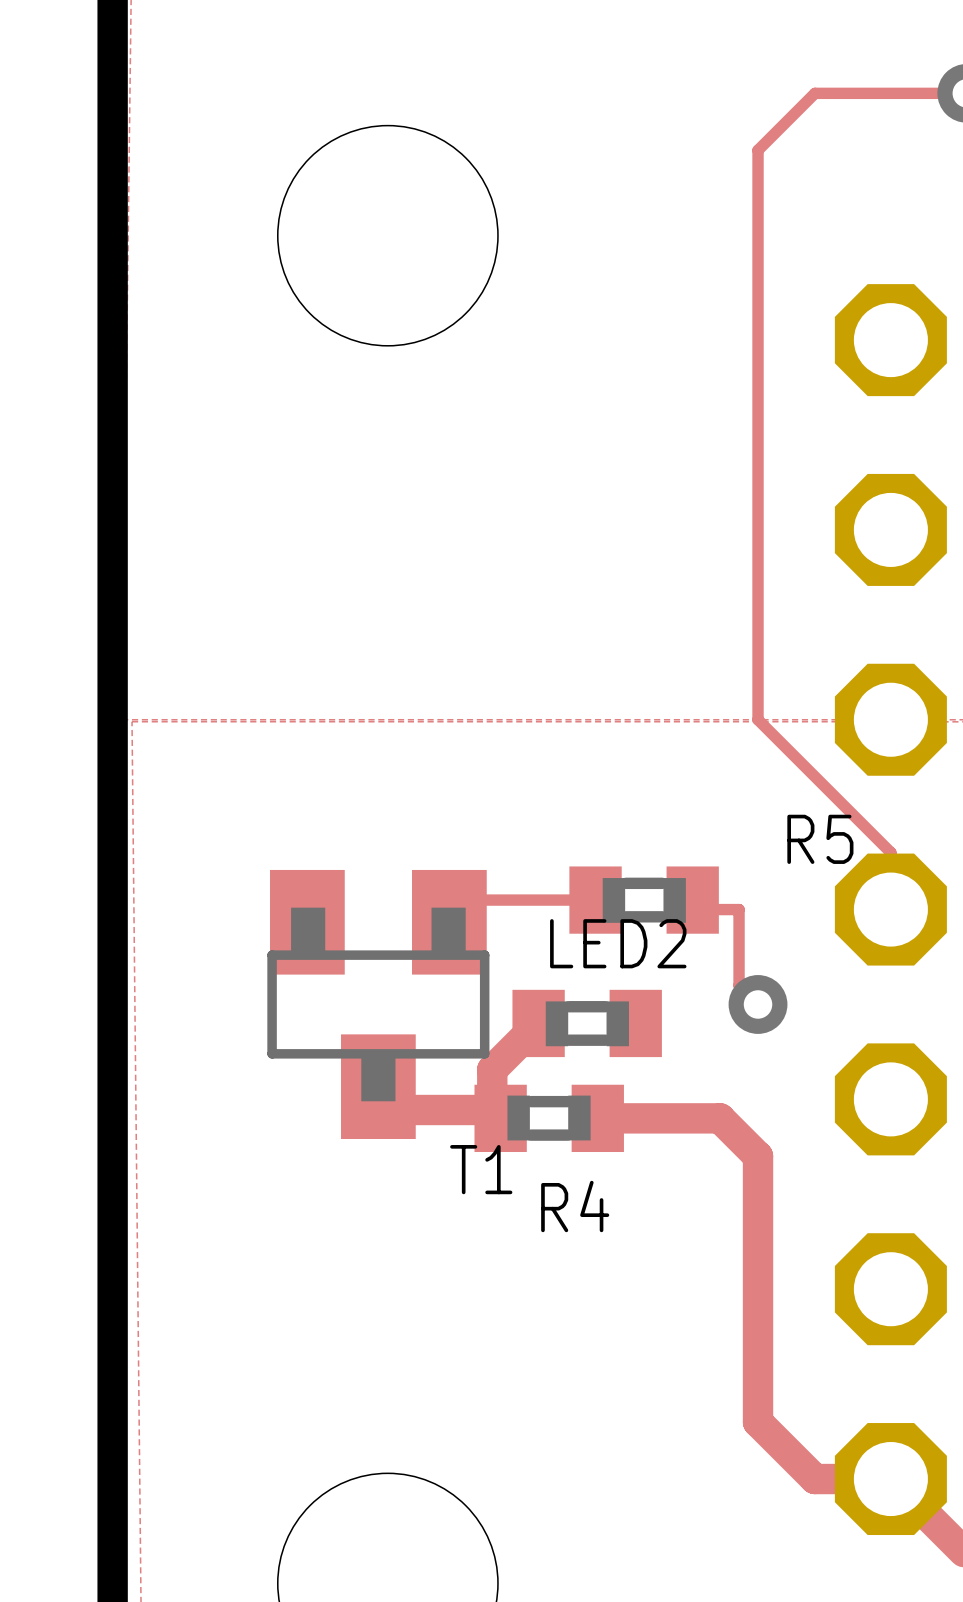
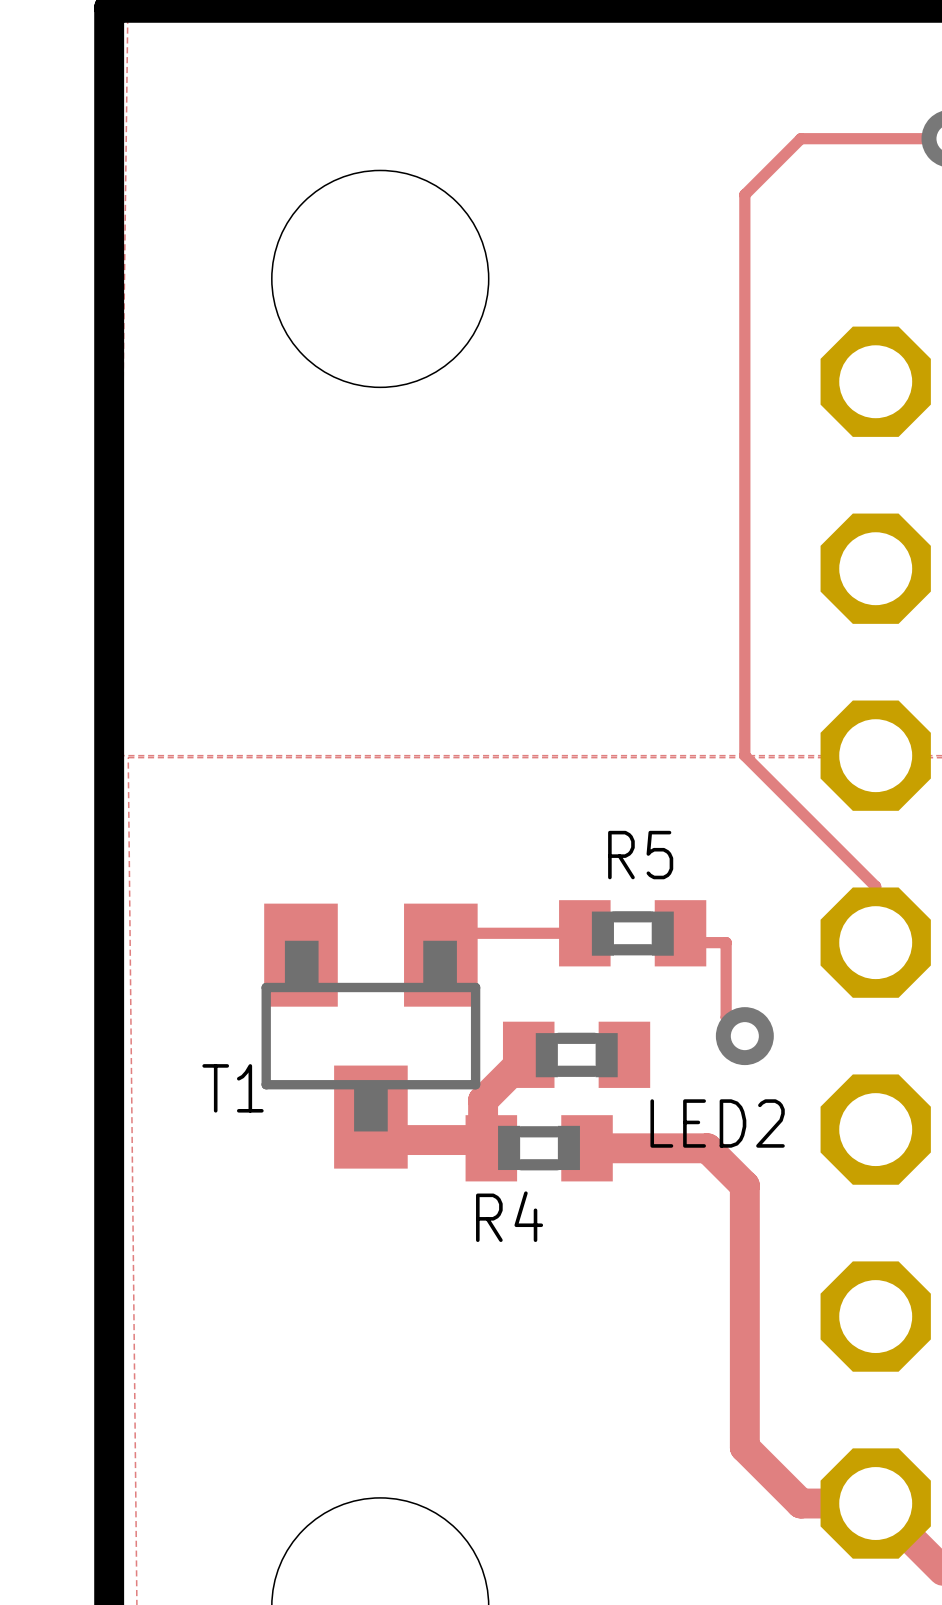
R5 name position: R5 (820, 839) -> R5 (640, 855)
LED2 name position: LED2 (618, 943) -> LED2 (717, 1123)
T1 name position: T1 (481, 1169) -> T1 (233, 1088)
R4 name position: R4 (575, 1206) -> R4 (509, 1216)

